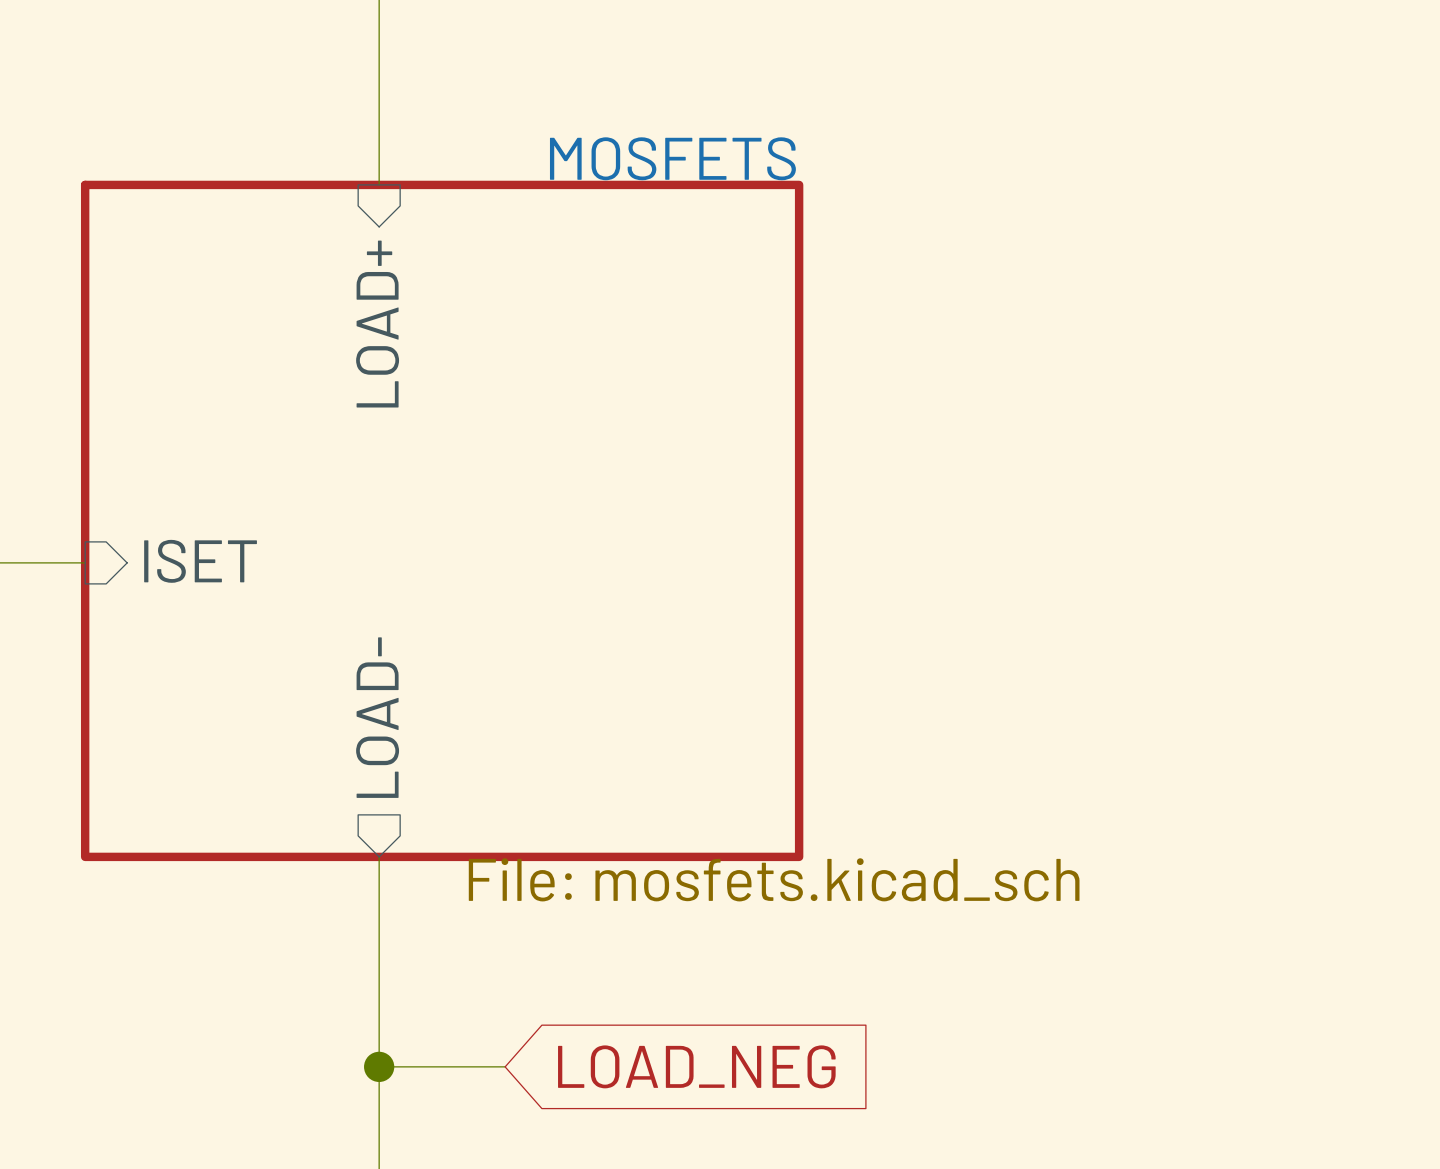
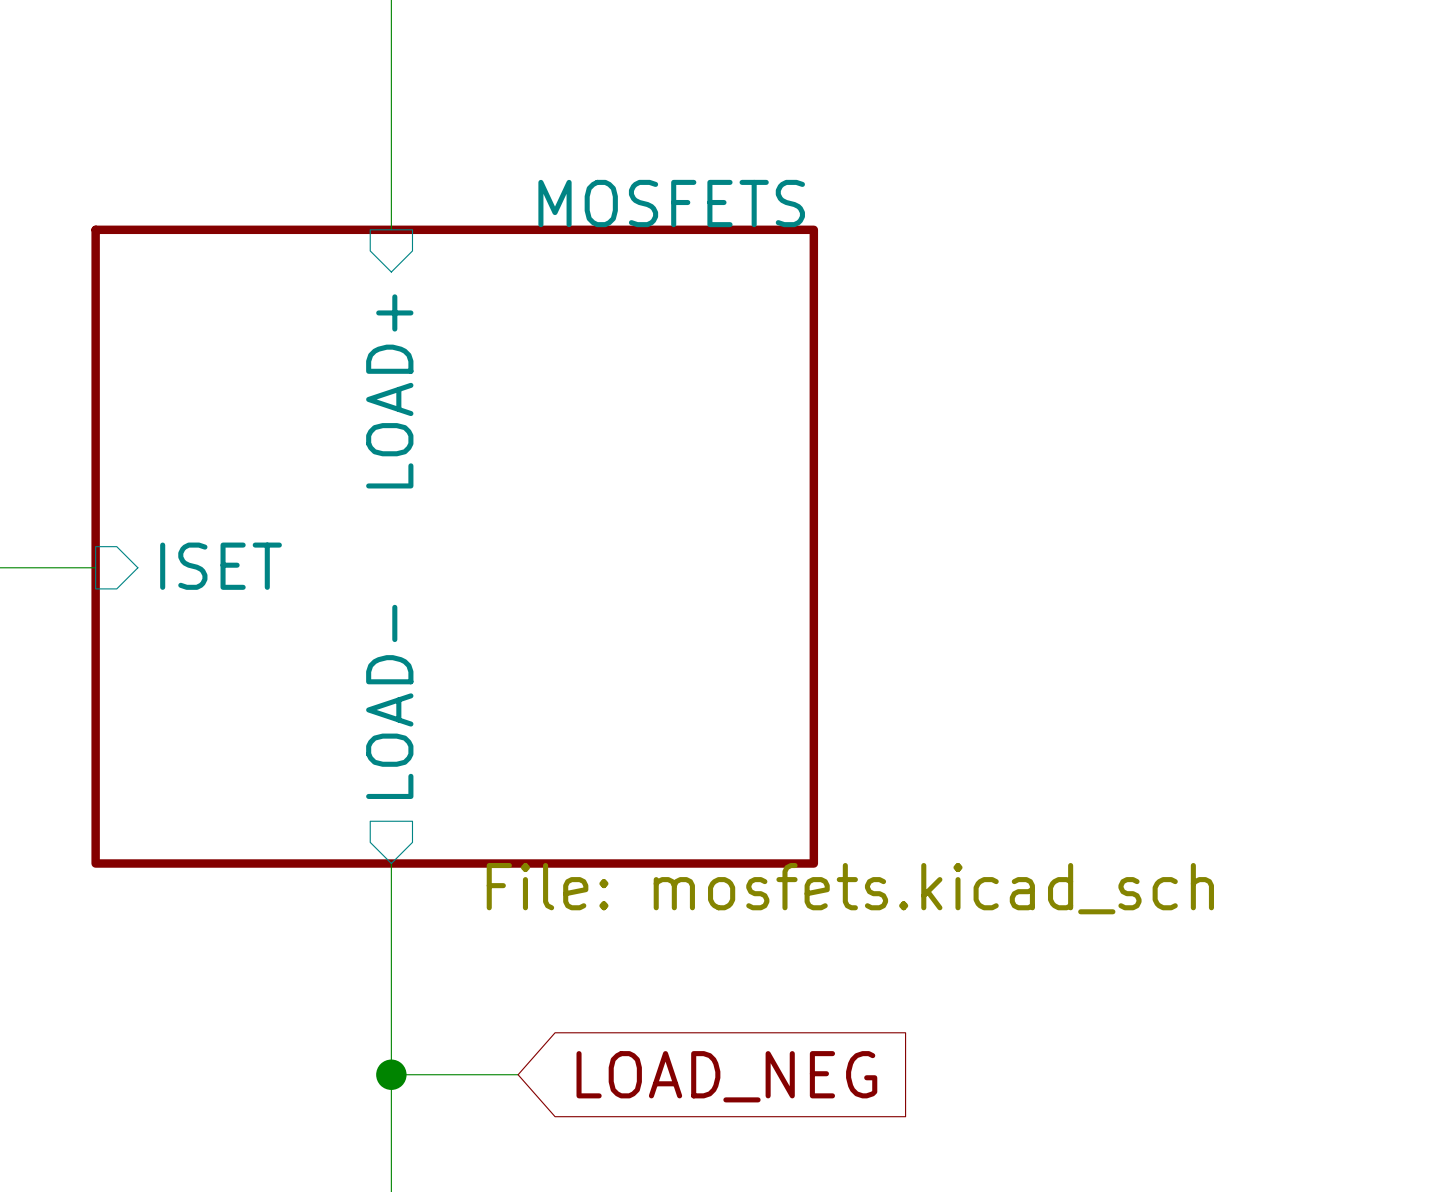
sheet MOSFETS shape: [80, 180, 804, 862] -> [91, 225, 819, 868]
wire: none -> (391, 187) (391, 229)
sheet pin position: LOAD+ (377, 324) -> LOAD+ (389, 391)

